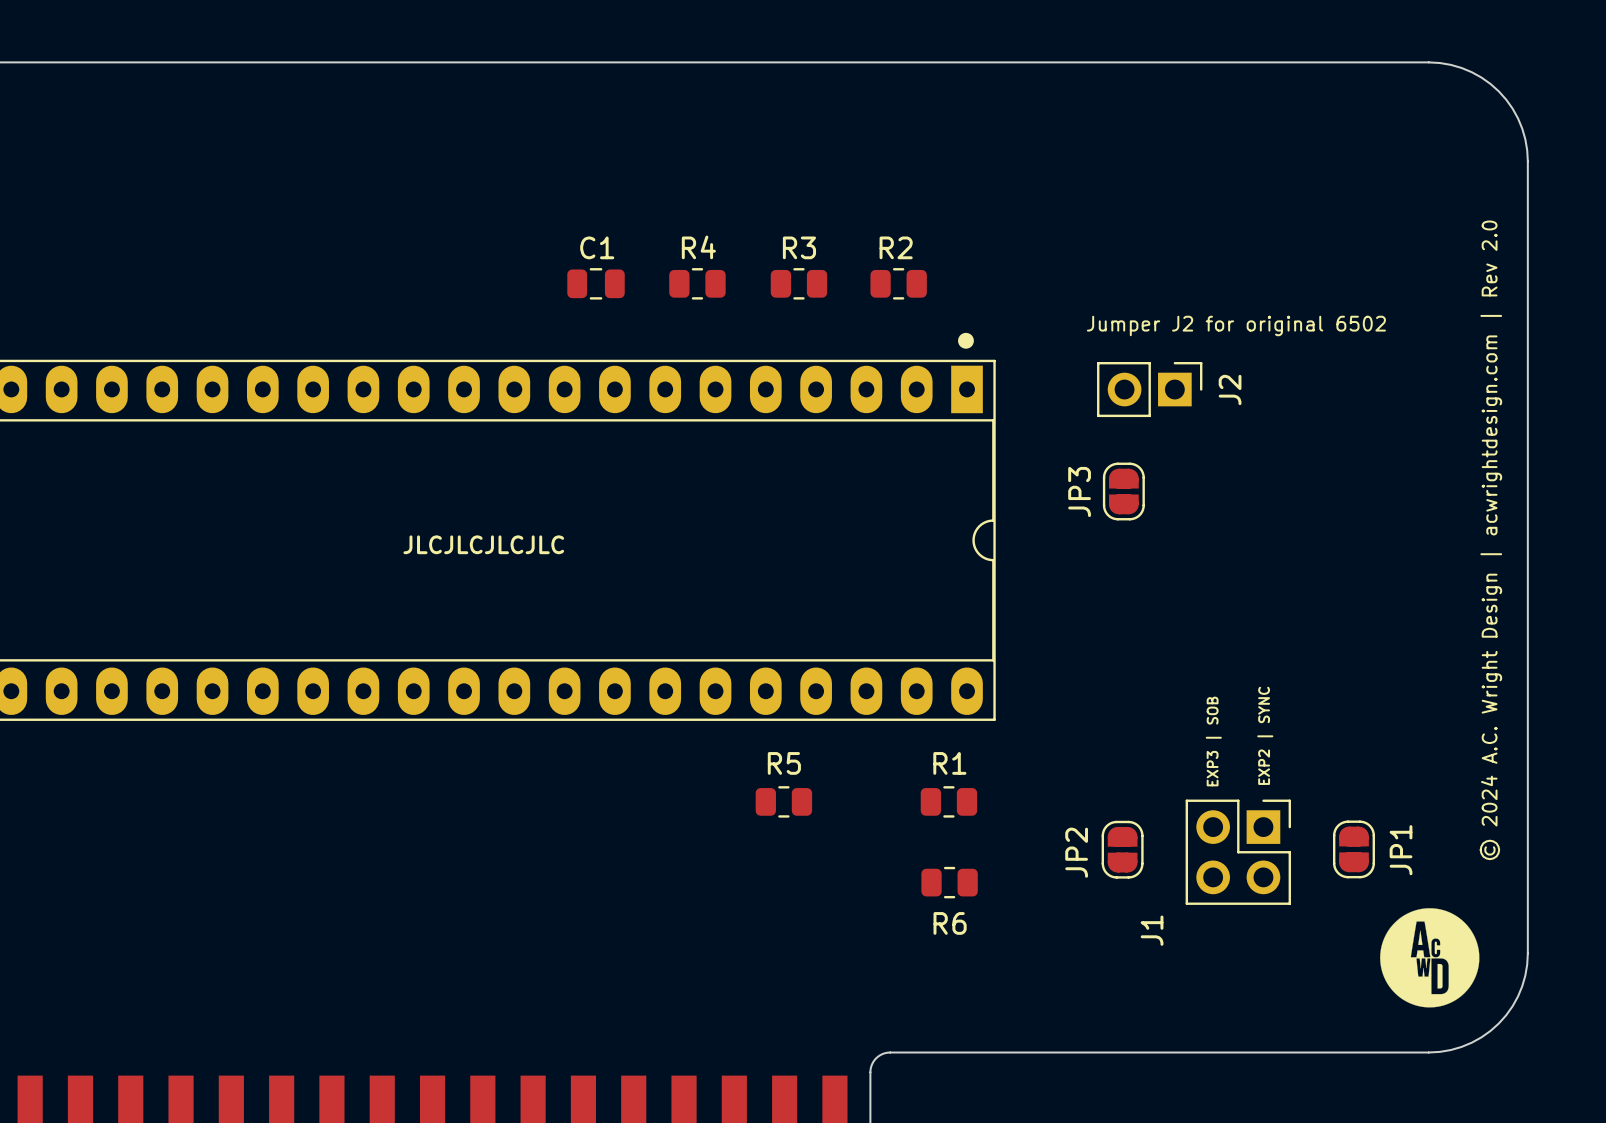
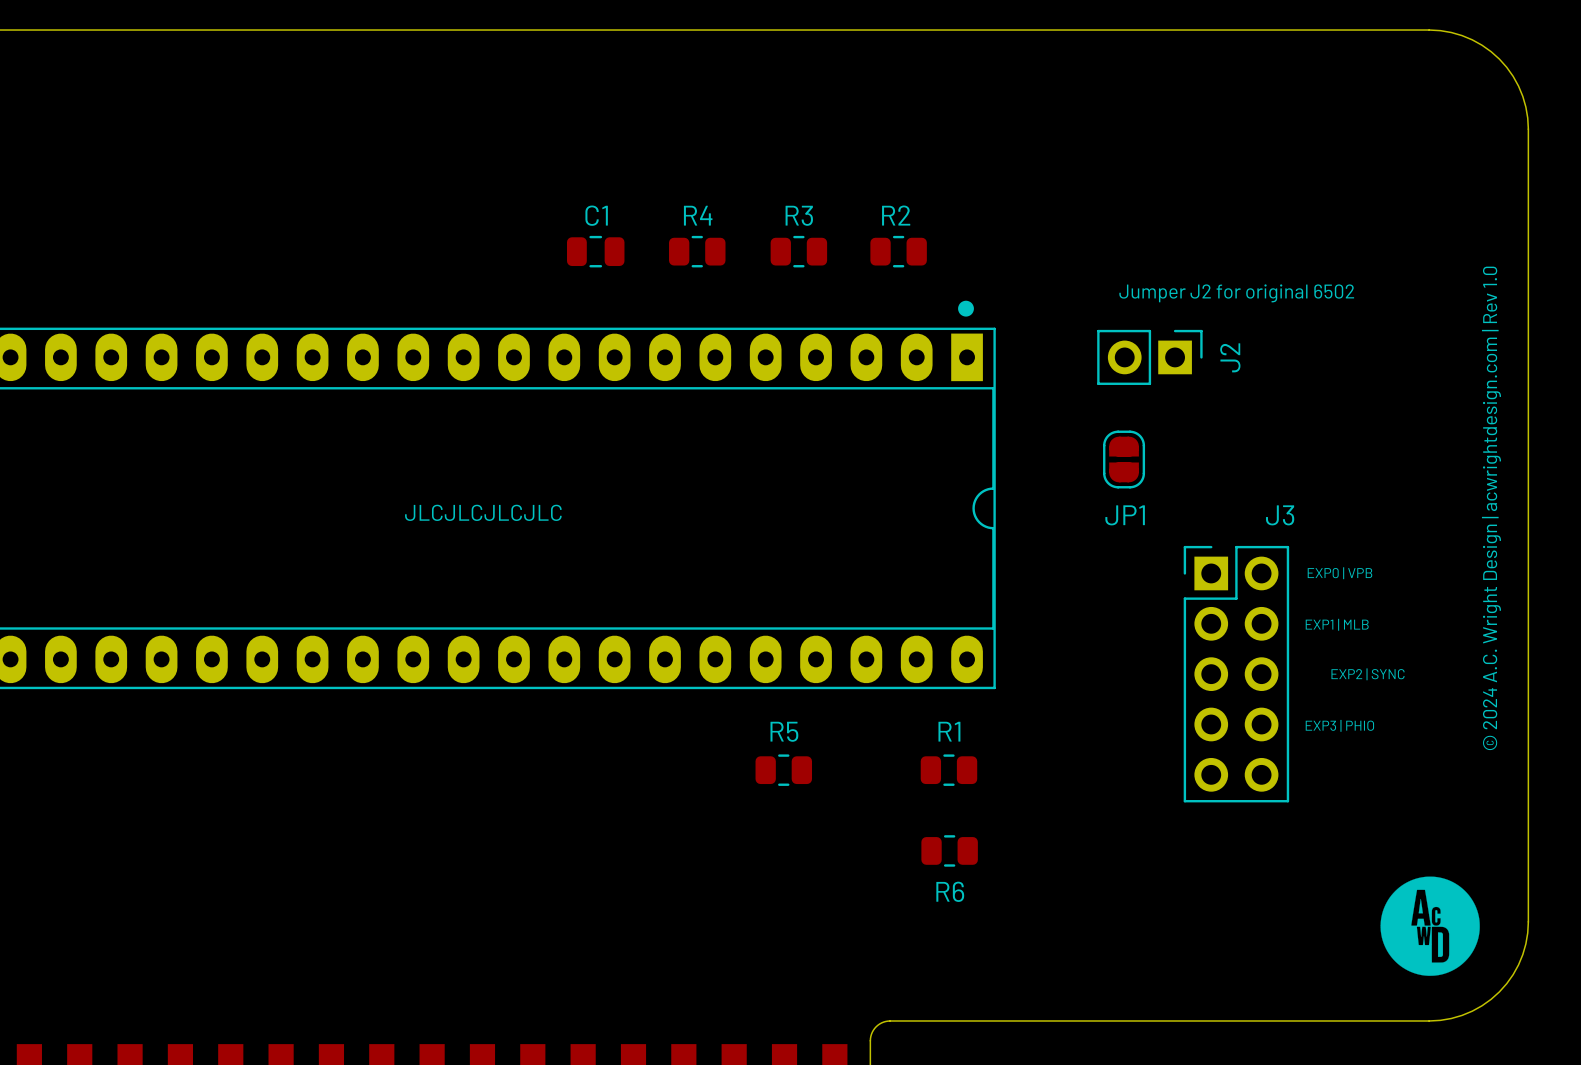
JP3 name: JP3 (1079, 491) -> JP1 (1125, 515)
text: © 2024 A.C. Wright Design | acwrightdesign.com | Rev 2.0 (1490, 540) -> © 2024 A.C. Wright Design | acwrightdesign.com | Rev 1.0 (1491, 508)
text: none -> EXP0 | VPB (1339, 573)
text: none -> EXP1 | MLB (1337, 624)
J3: none -> (1236, 674)
text rotation: 0° (1265, 735) -> 90° clockwise (1368, 674)
text: EXP3 | SOB (1213, 741) -> none
text: none -> EXP3 | PHIO (1339, 725)
JP2: (1122, 849) -> none
JP1: (1353, 849) -> none
J1: (1238, 852) -> none

